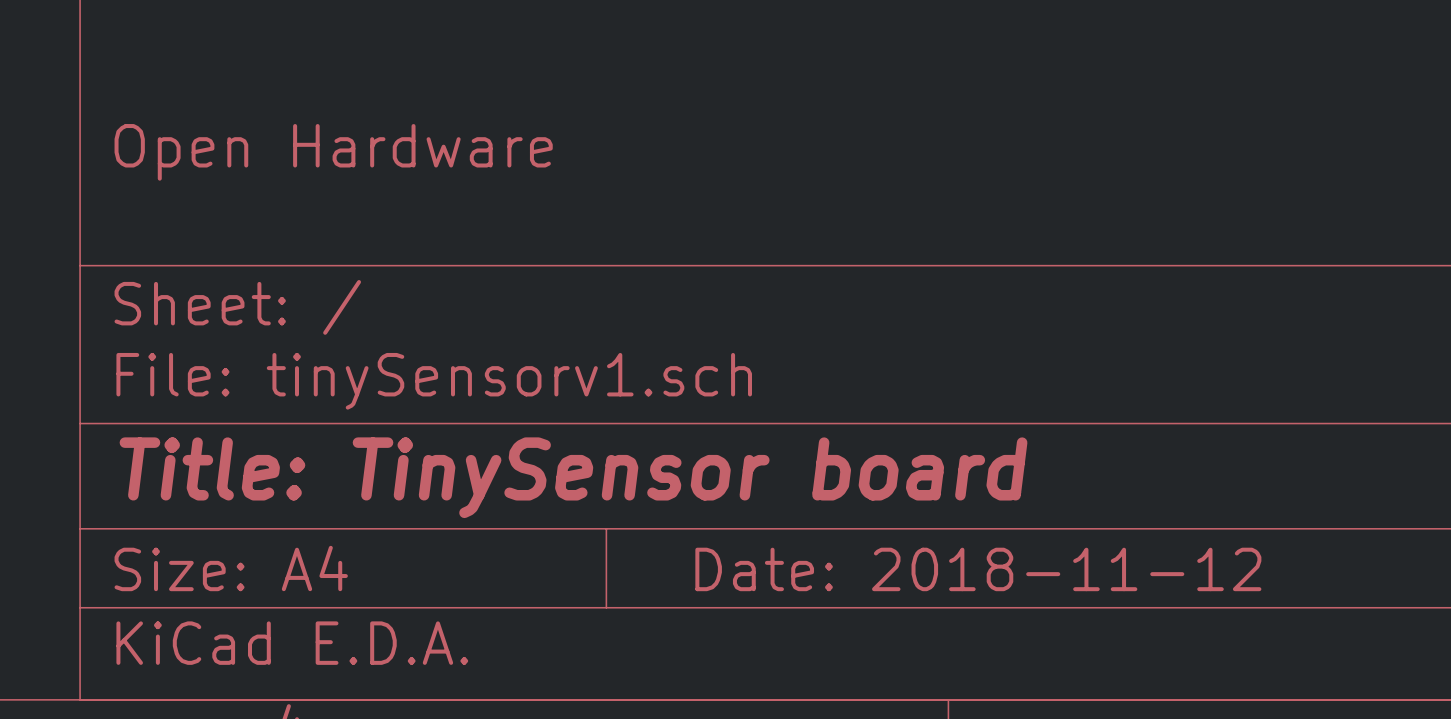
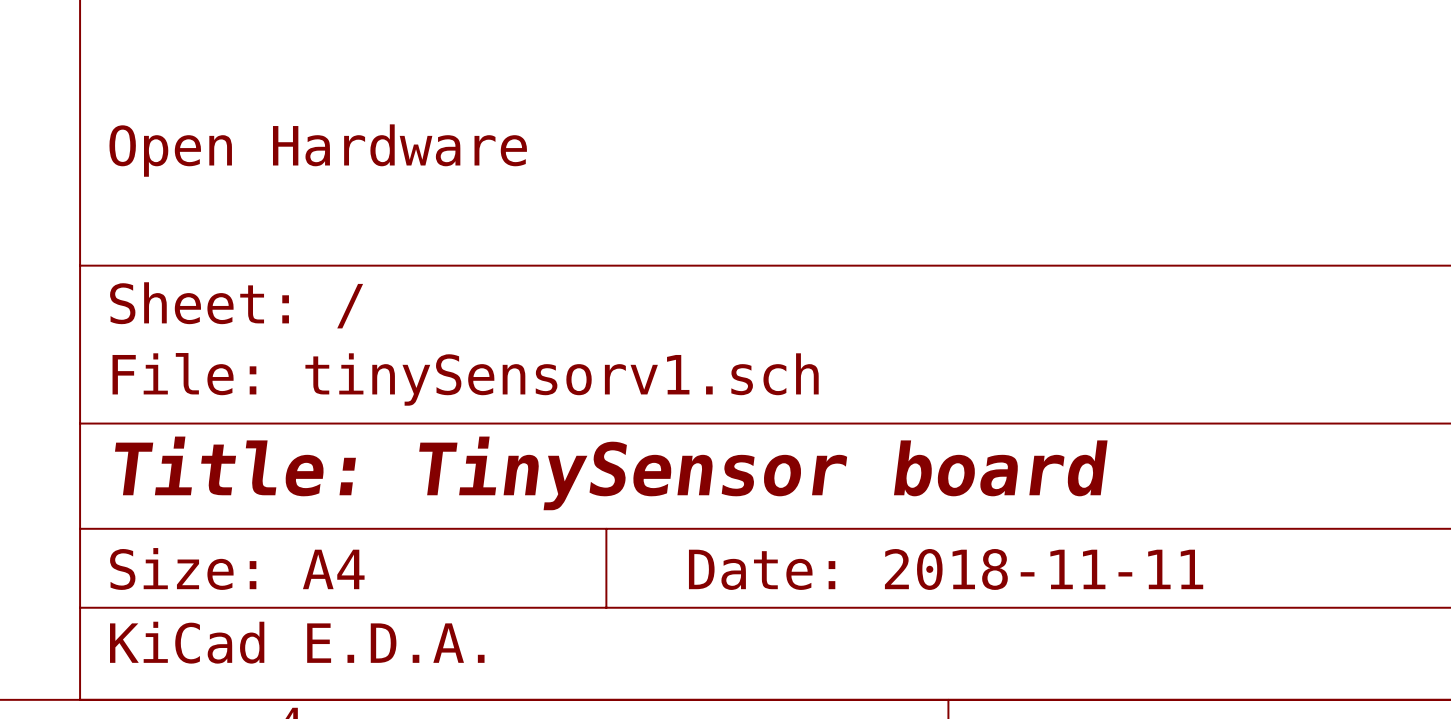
title block: Date: 2018-11-12 (978, 569) -> Date: 2018-11-11 (946, 569)

